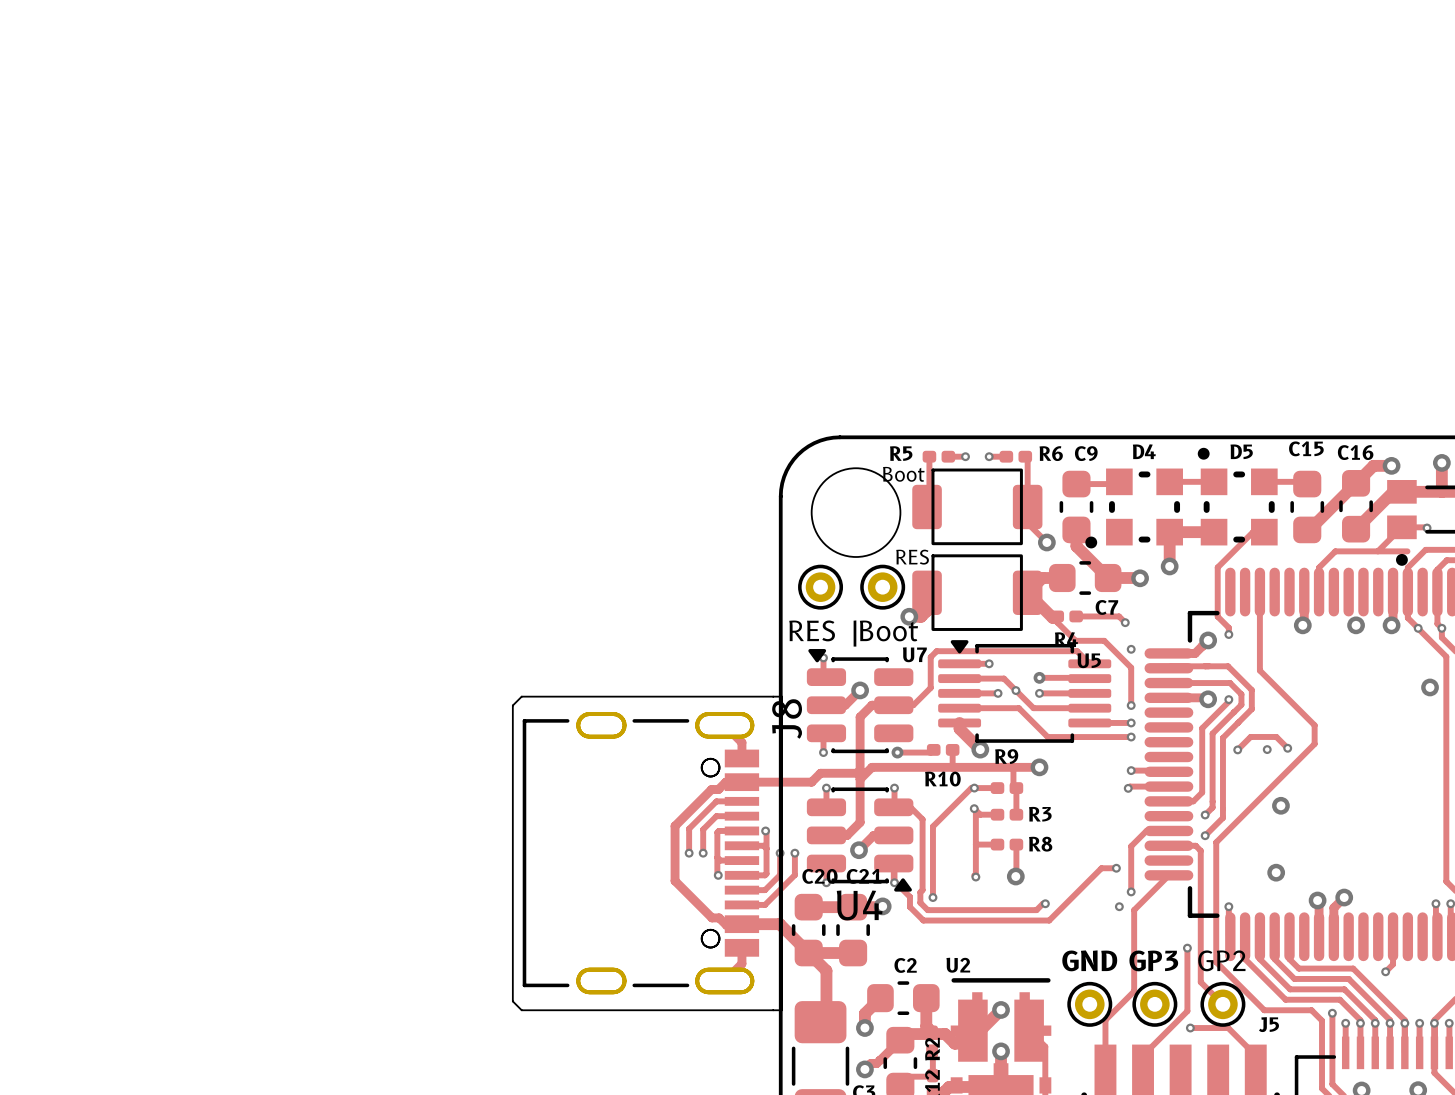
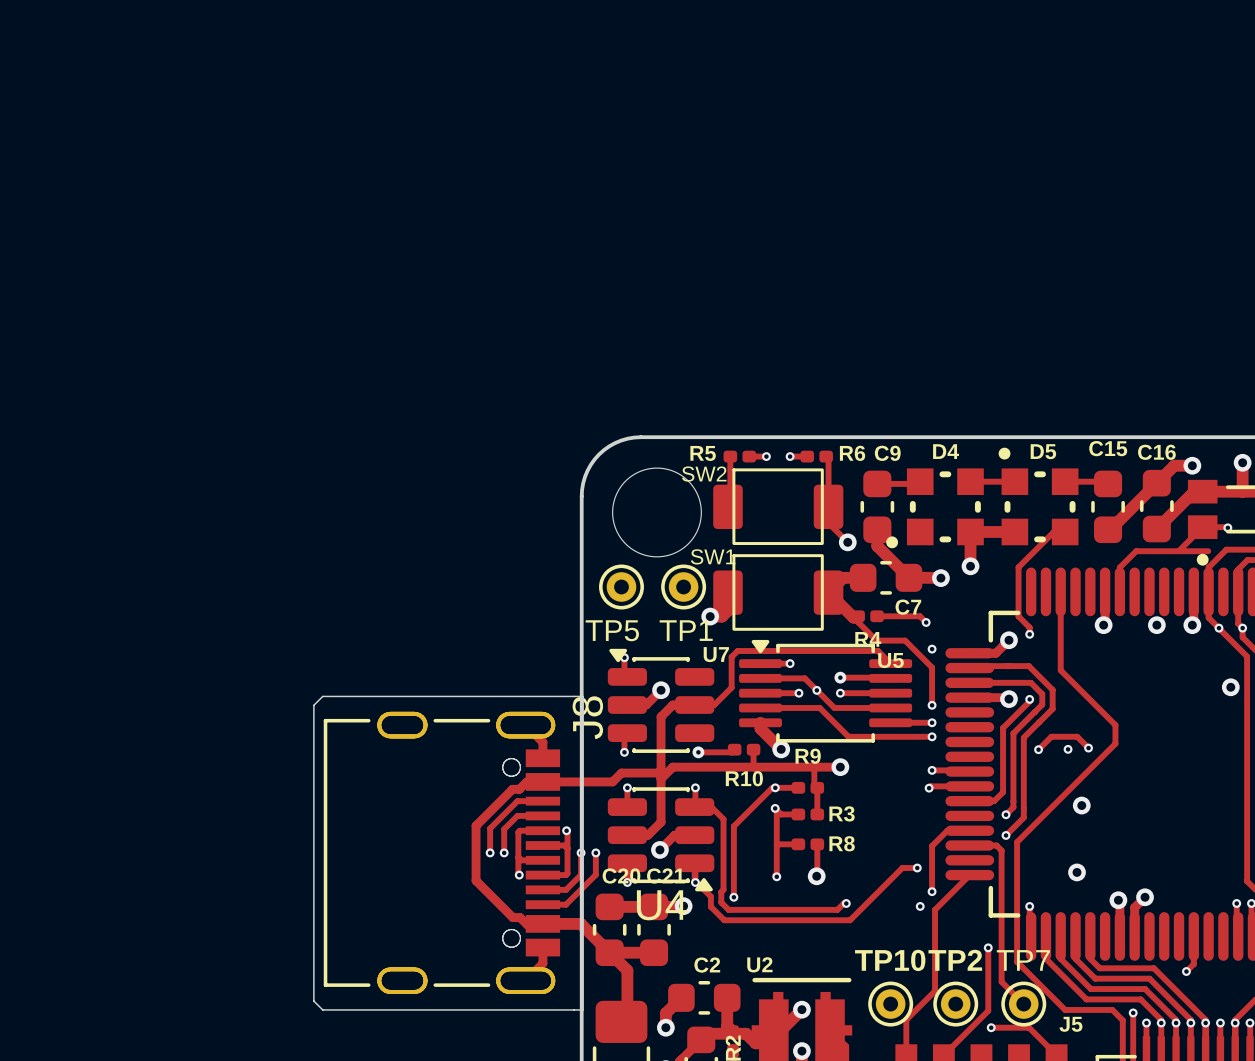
Boot name: Boot (903, 474) -> SW2 (704, 474)
RES name: RES (912, 557) -> SW1 (713, 556)
RES name: RES (812, 630) -> TP5 (612, 630)
|Boot name: |Boot (885, 633) -> TP1 (686, 630)
GND name: GND (1089, 960) -> TP10 (890, 960)
GP3 name: GP3 (1153, 960) -> TP2 (955, 960)
GP2 name: GP2 (1221, 960) -> TP7 (1023, 960)

